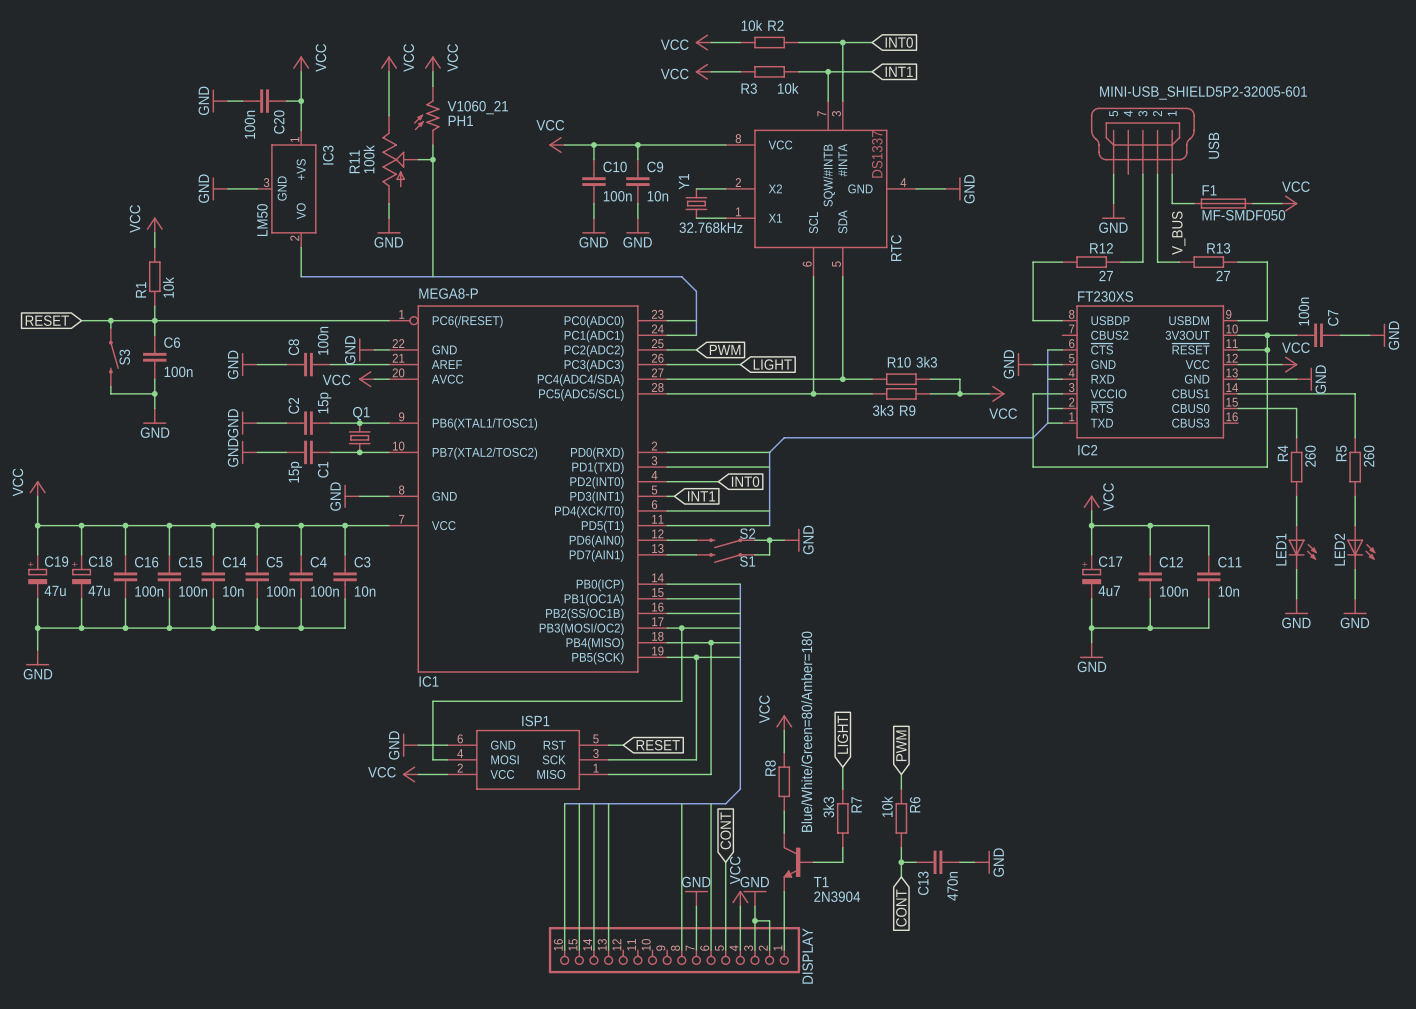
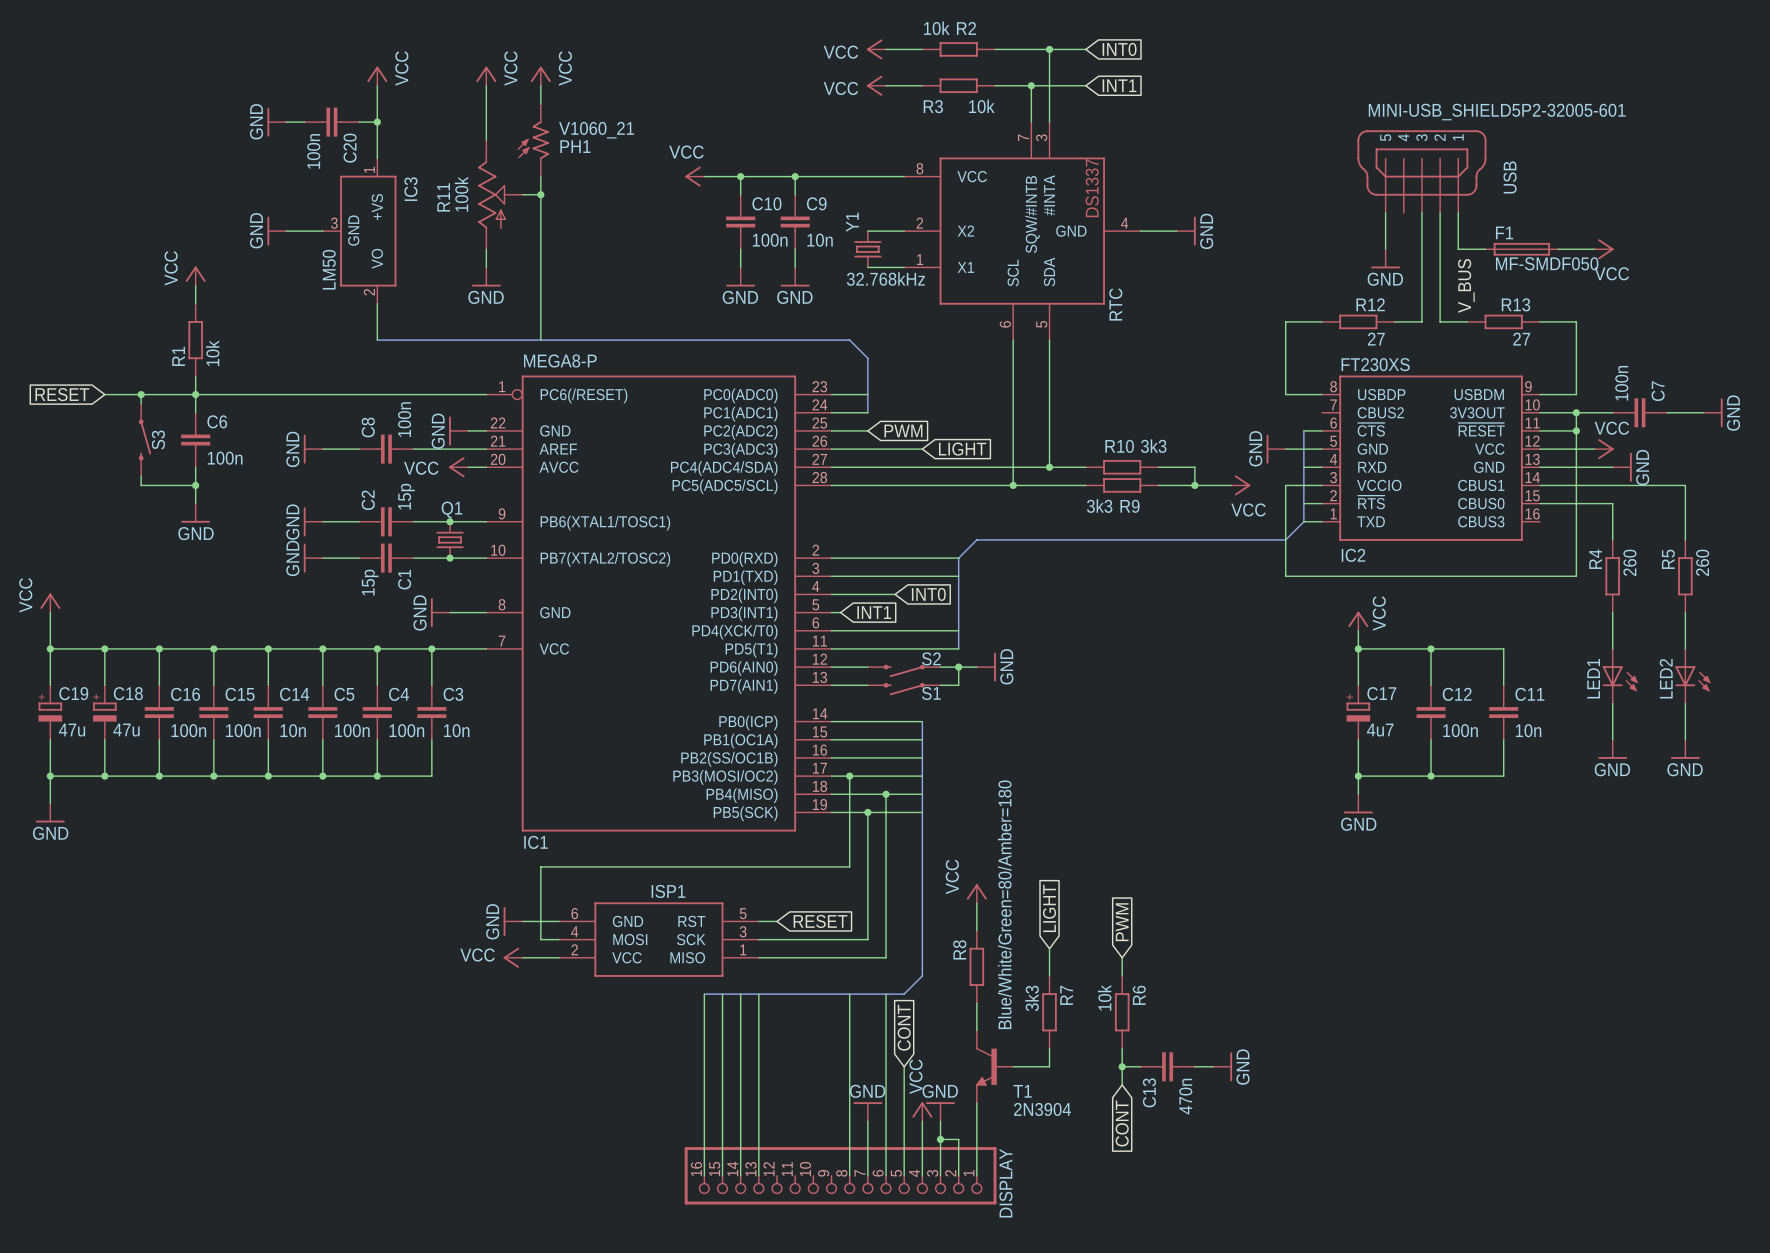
power symbol text position: VCC (1295, 186) -> VCC (1611, 273)

